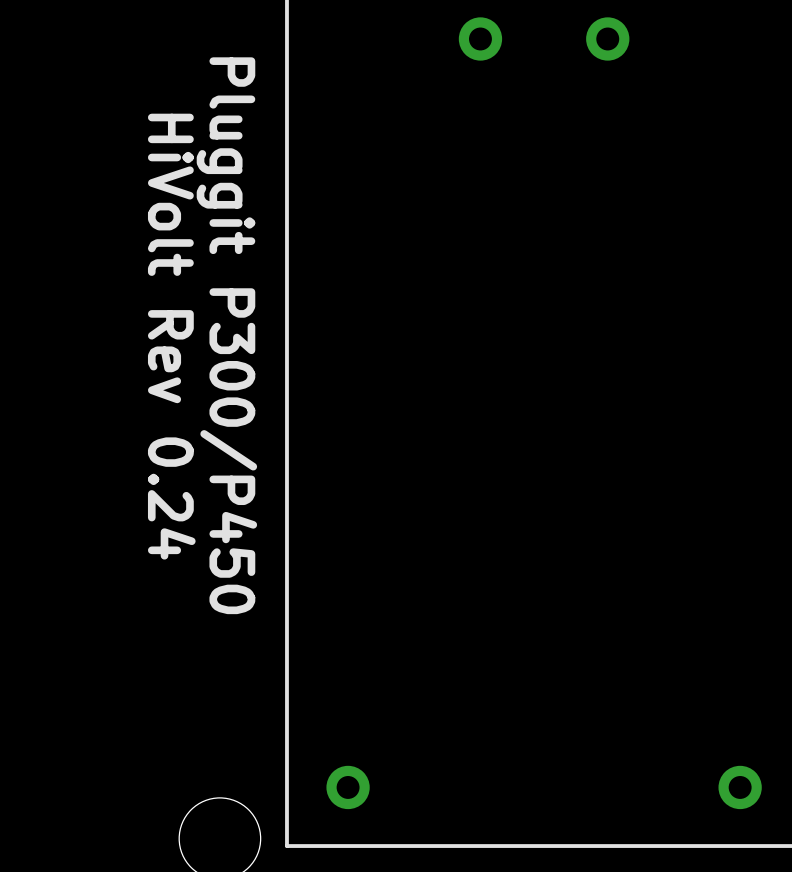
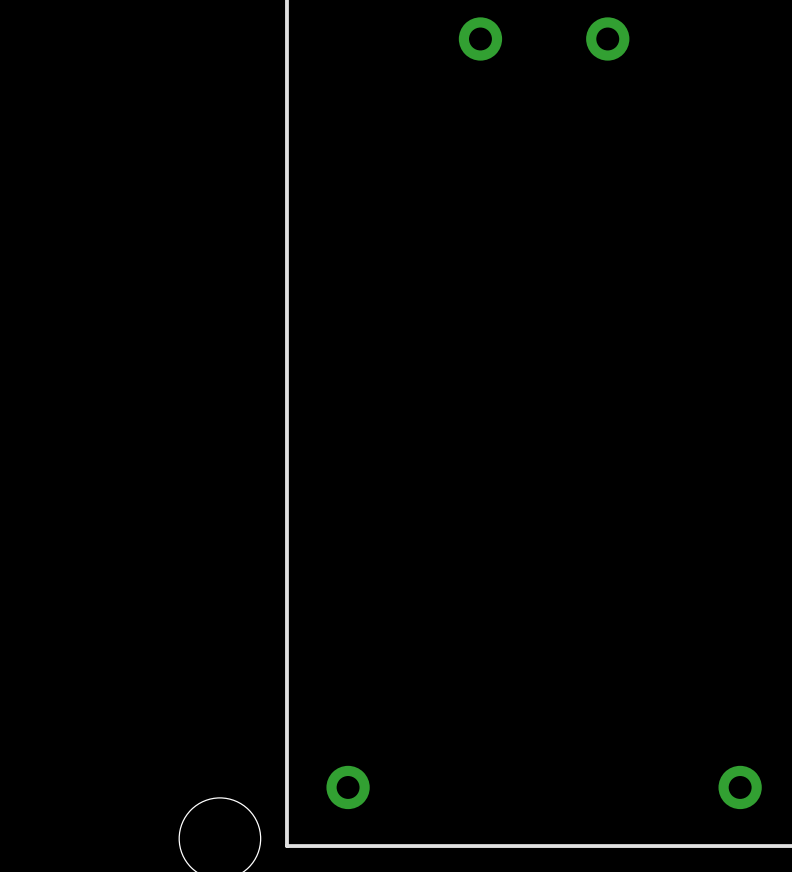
text: Pluggit P300/P450 (226, 335) -> none
text: HiVolt Rev 0.24 (171, 336) -> none

